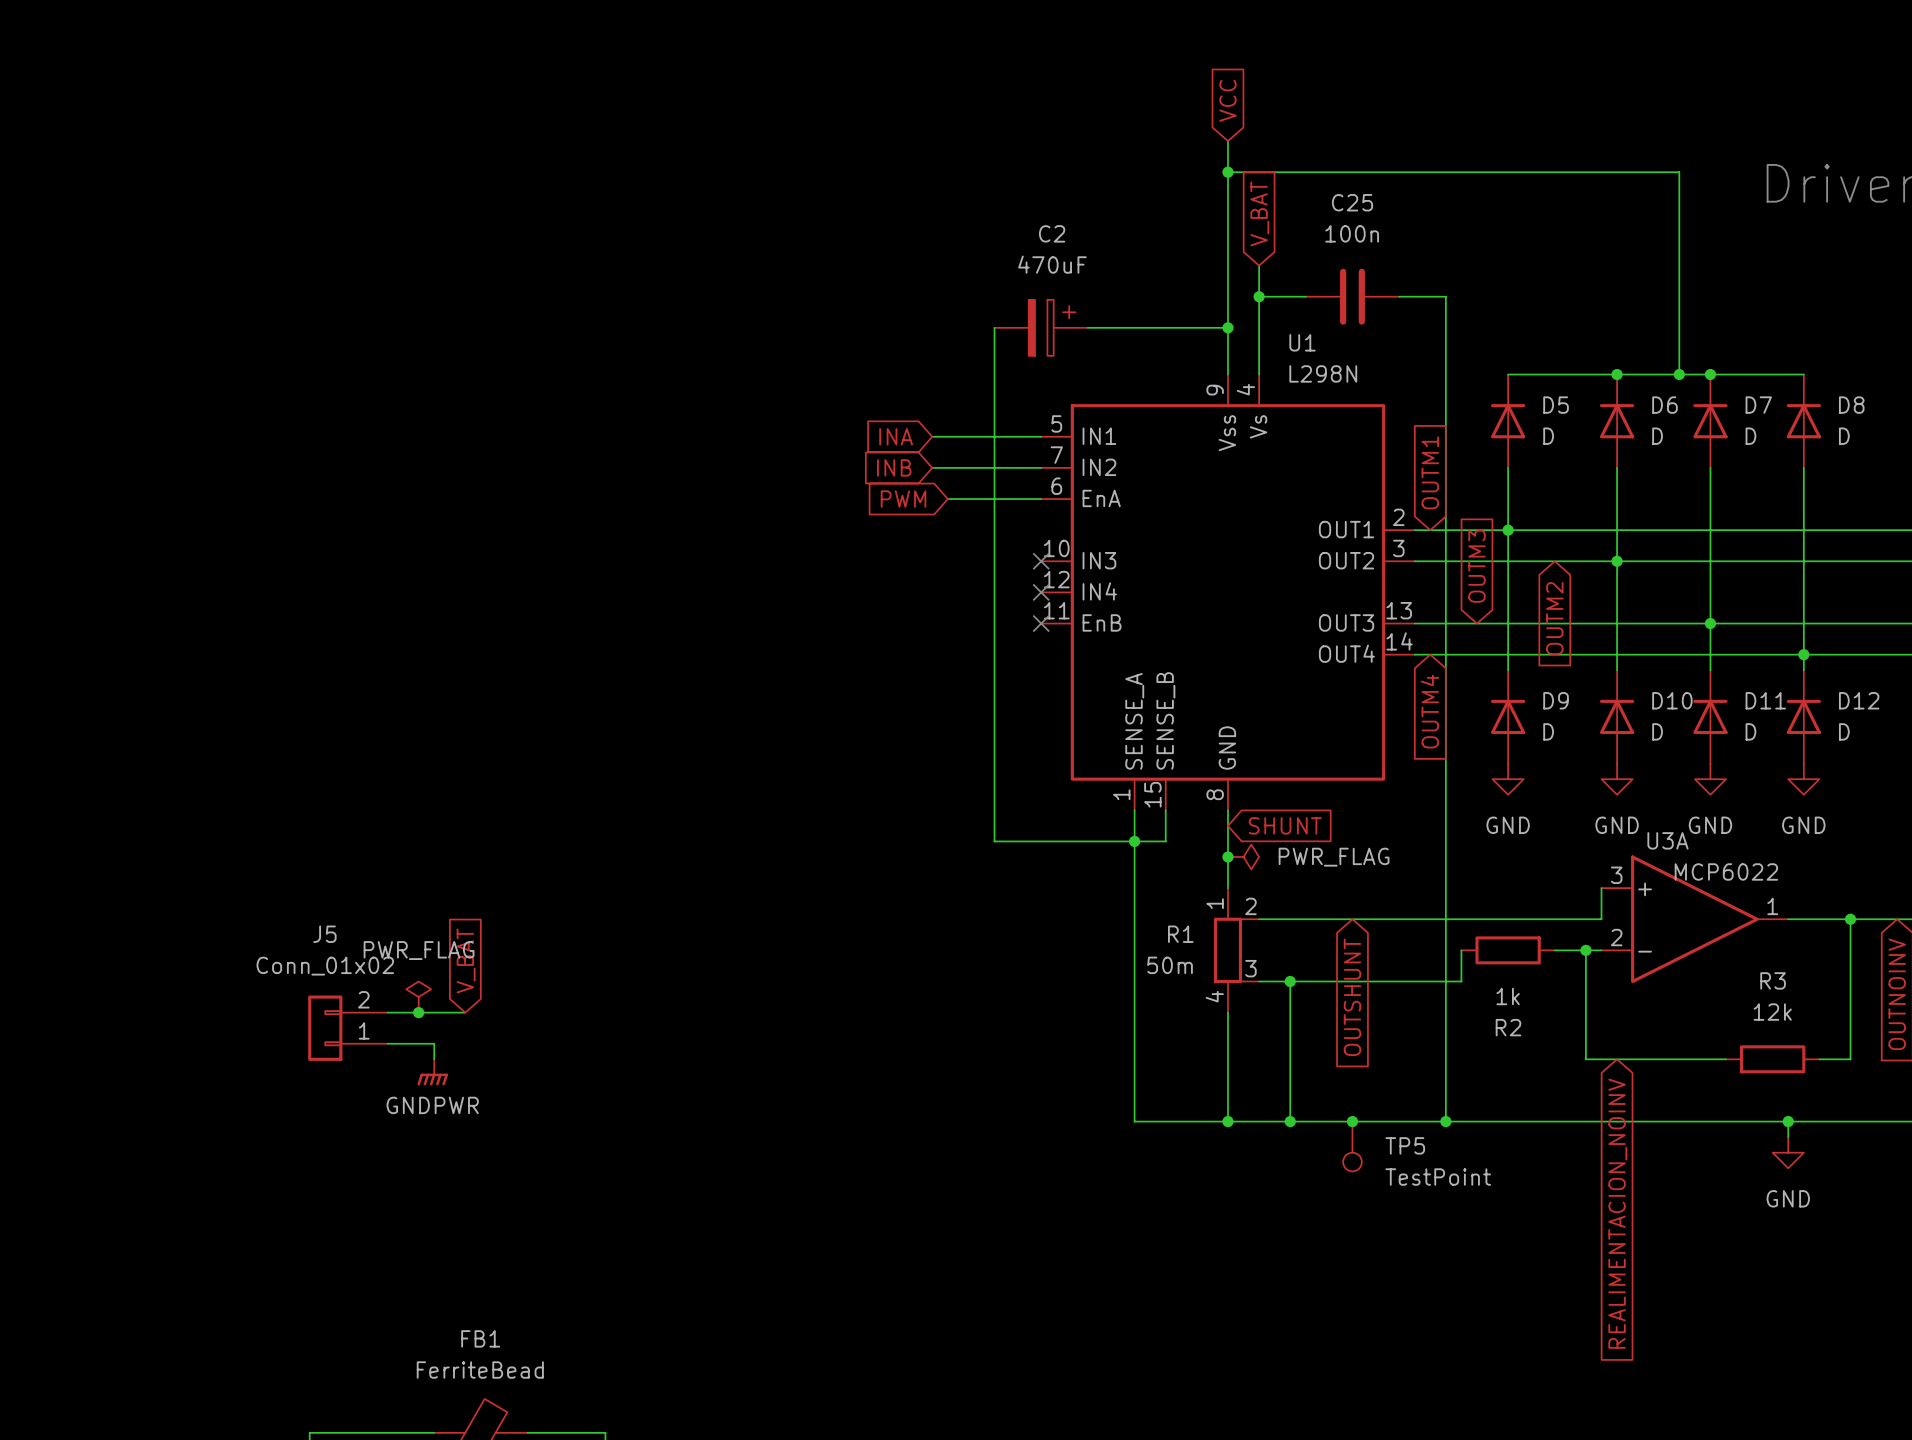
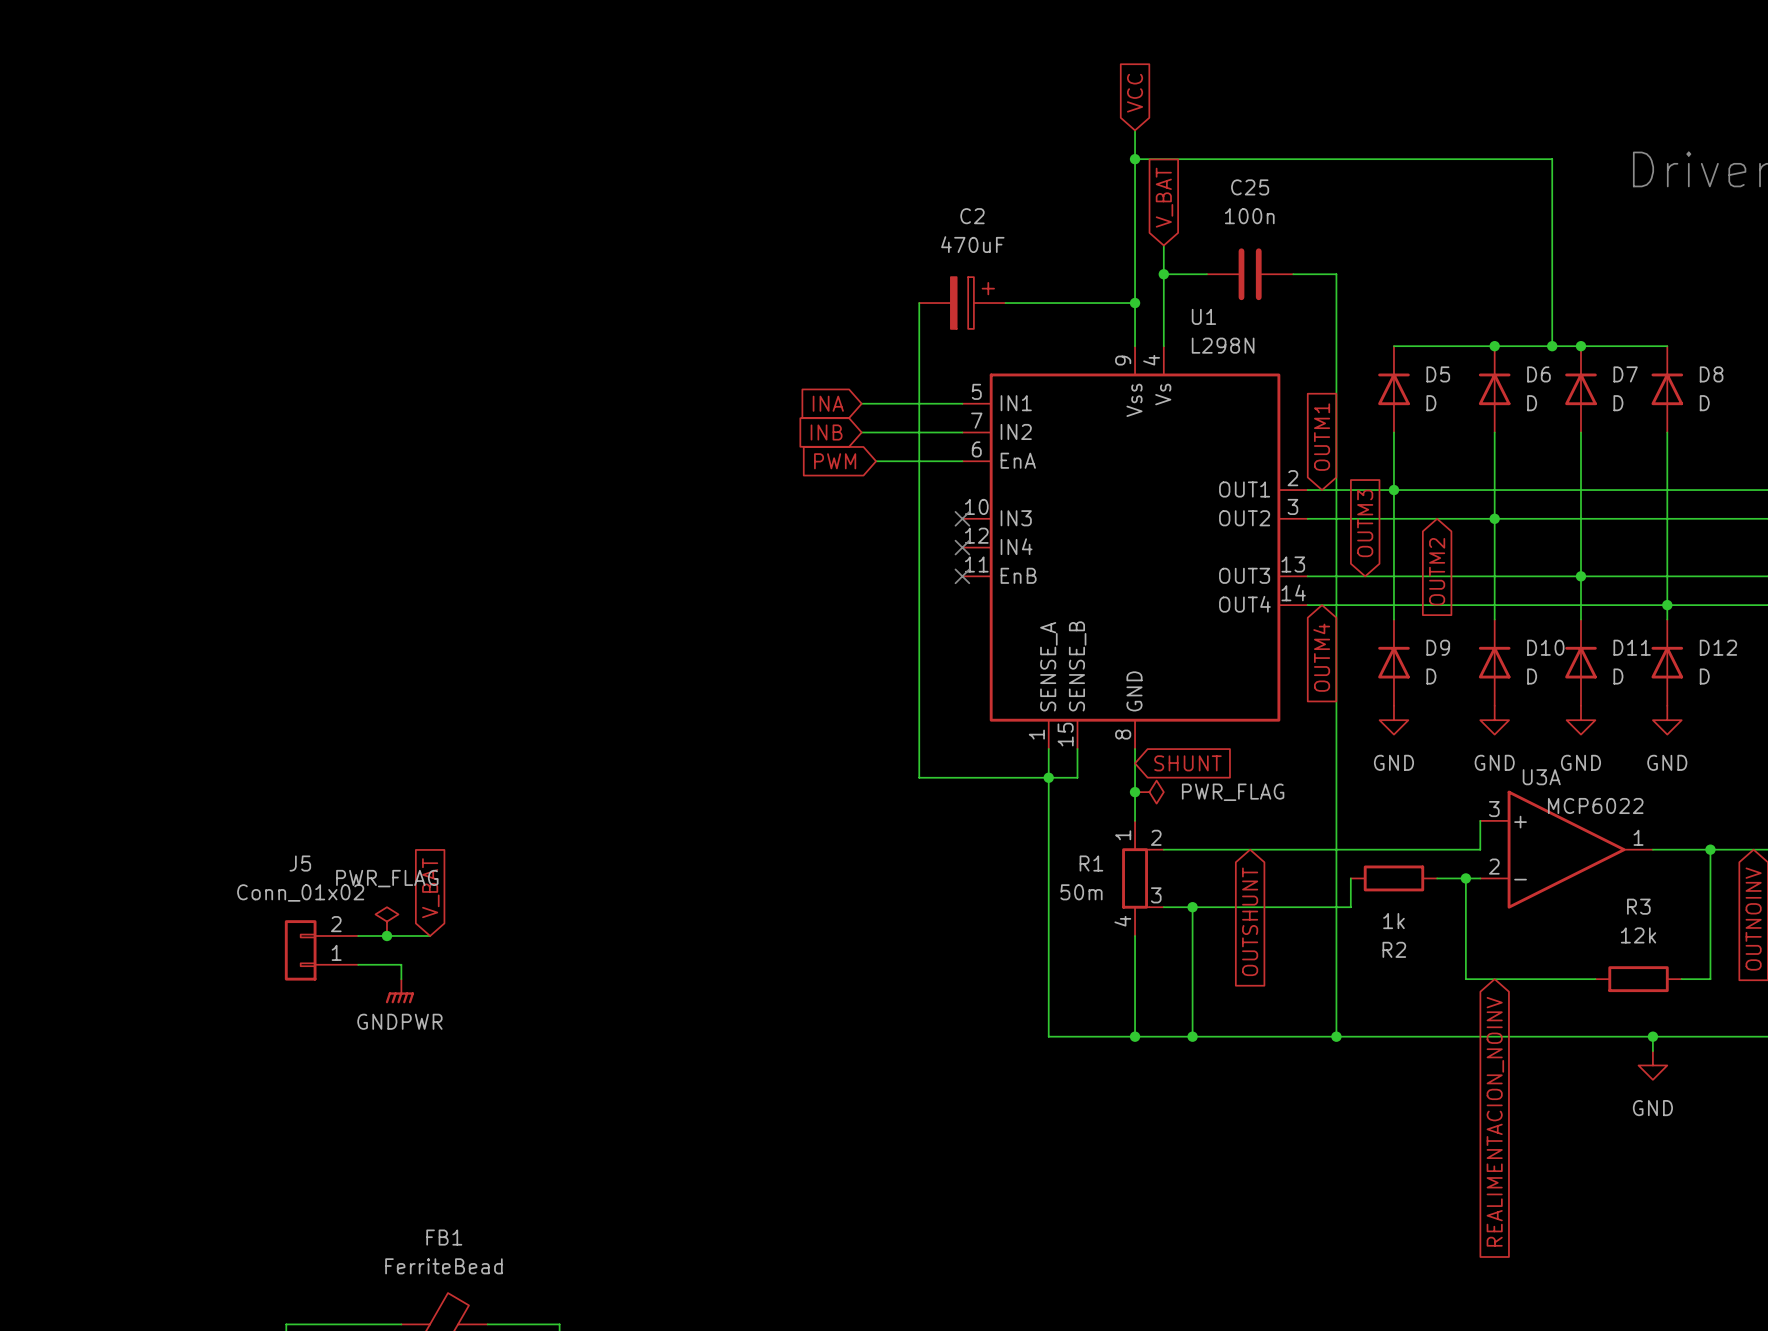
junction: (1352, 1121) -> none
TP5: TestPoint (1352, 1146) -> none

